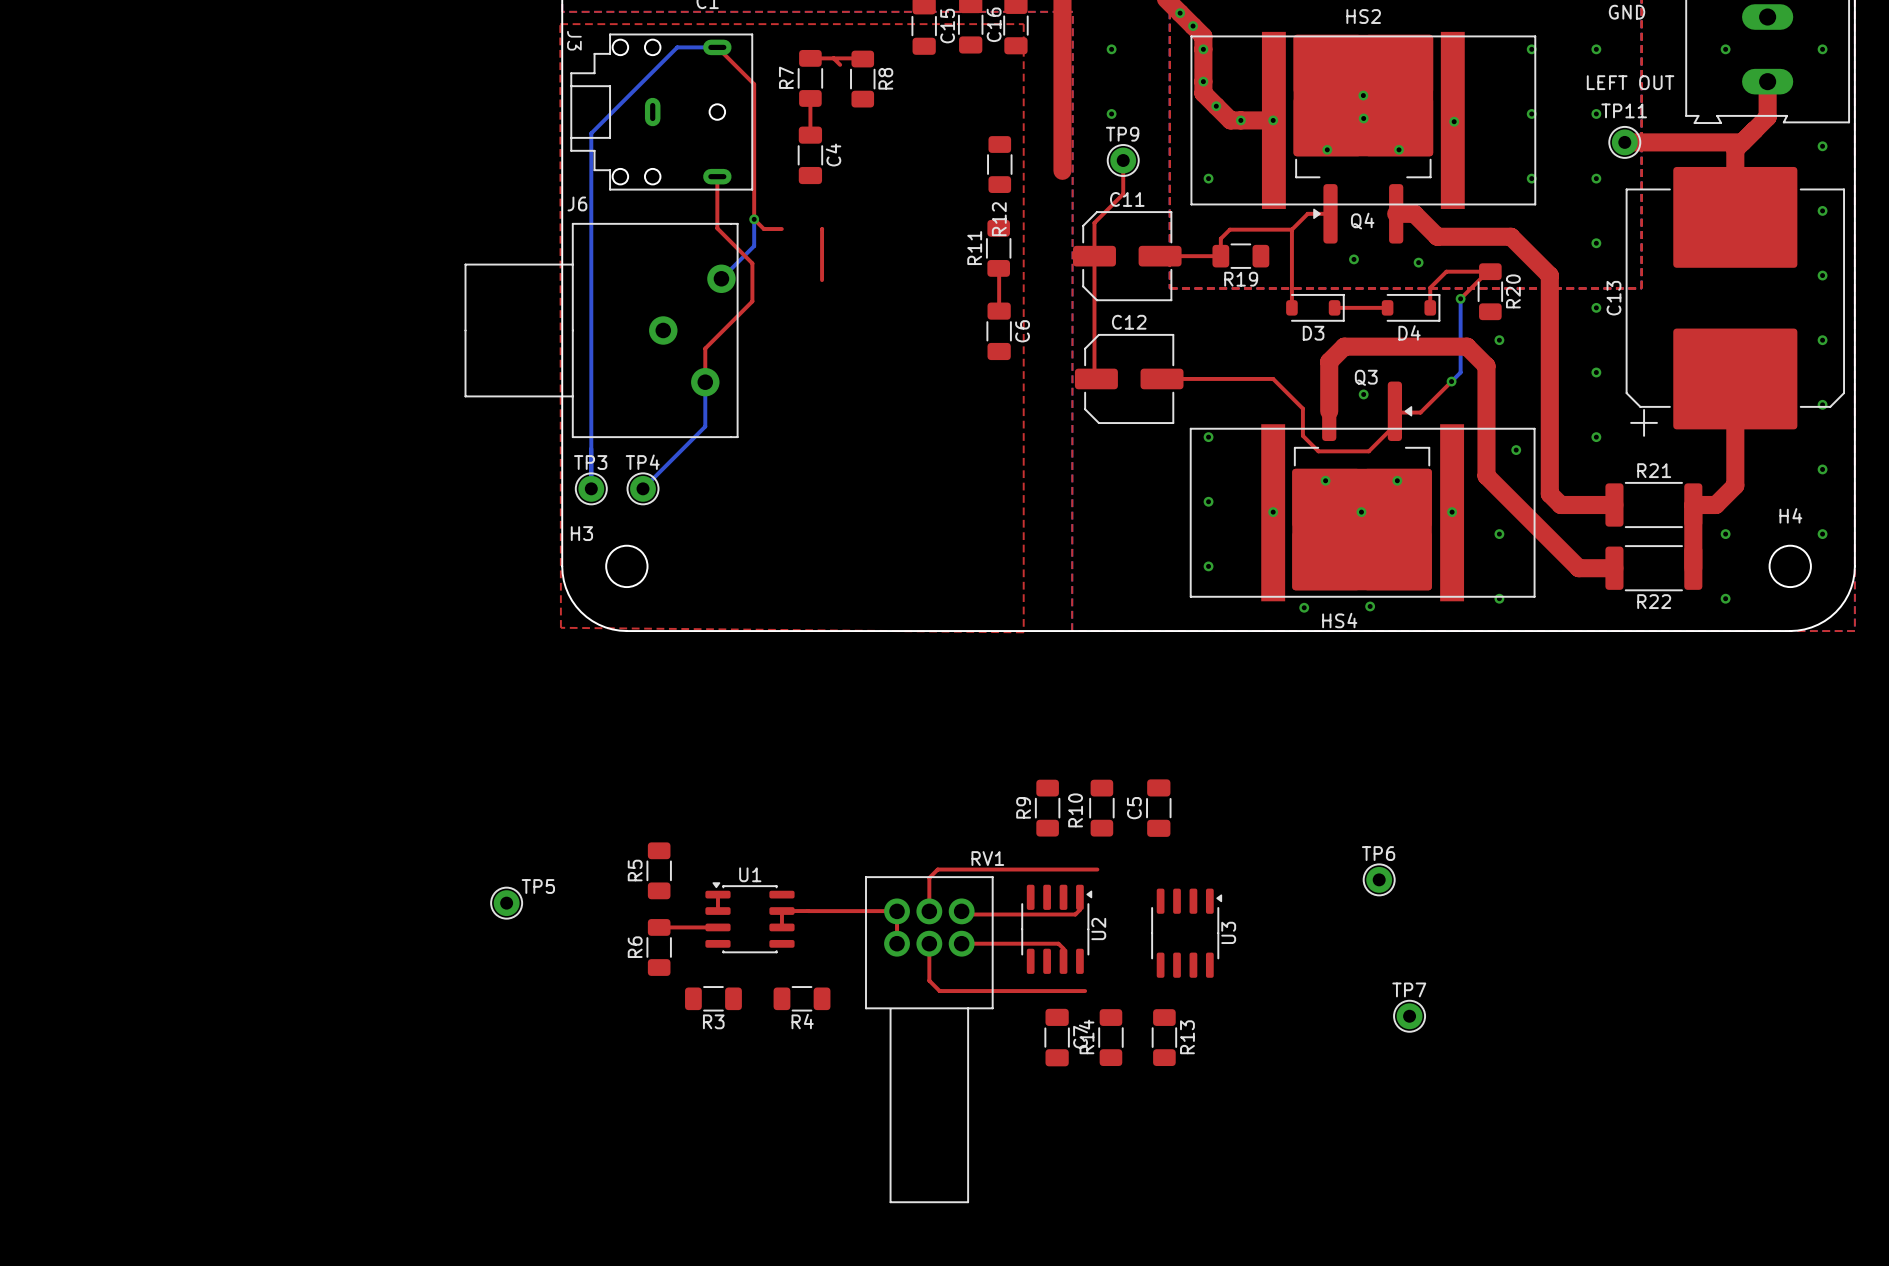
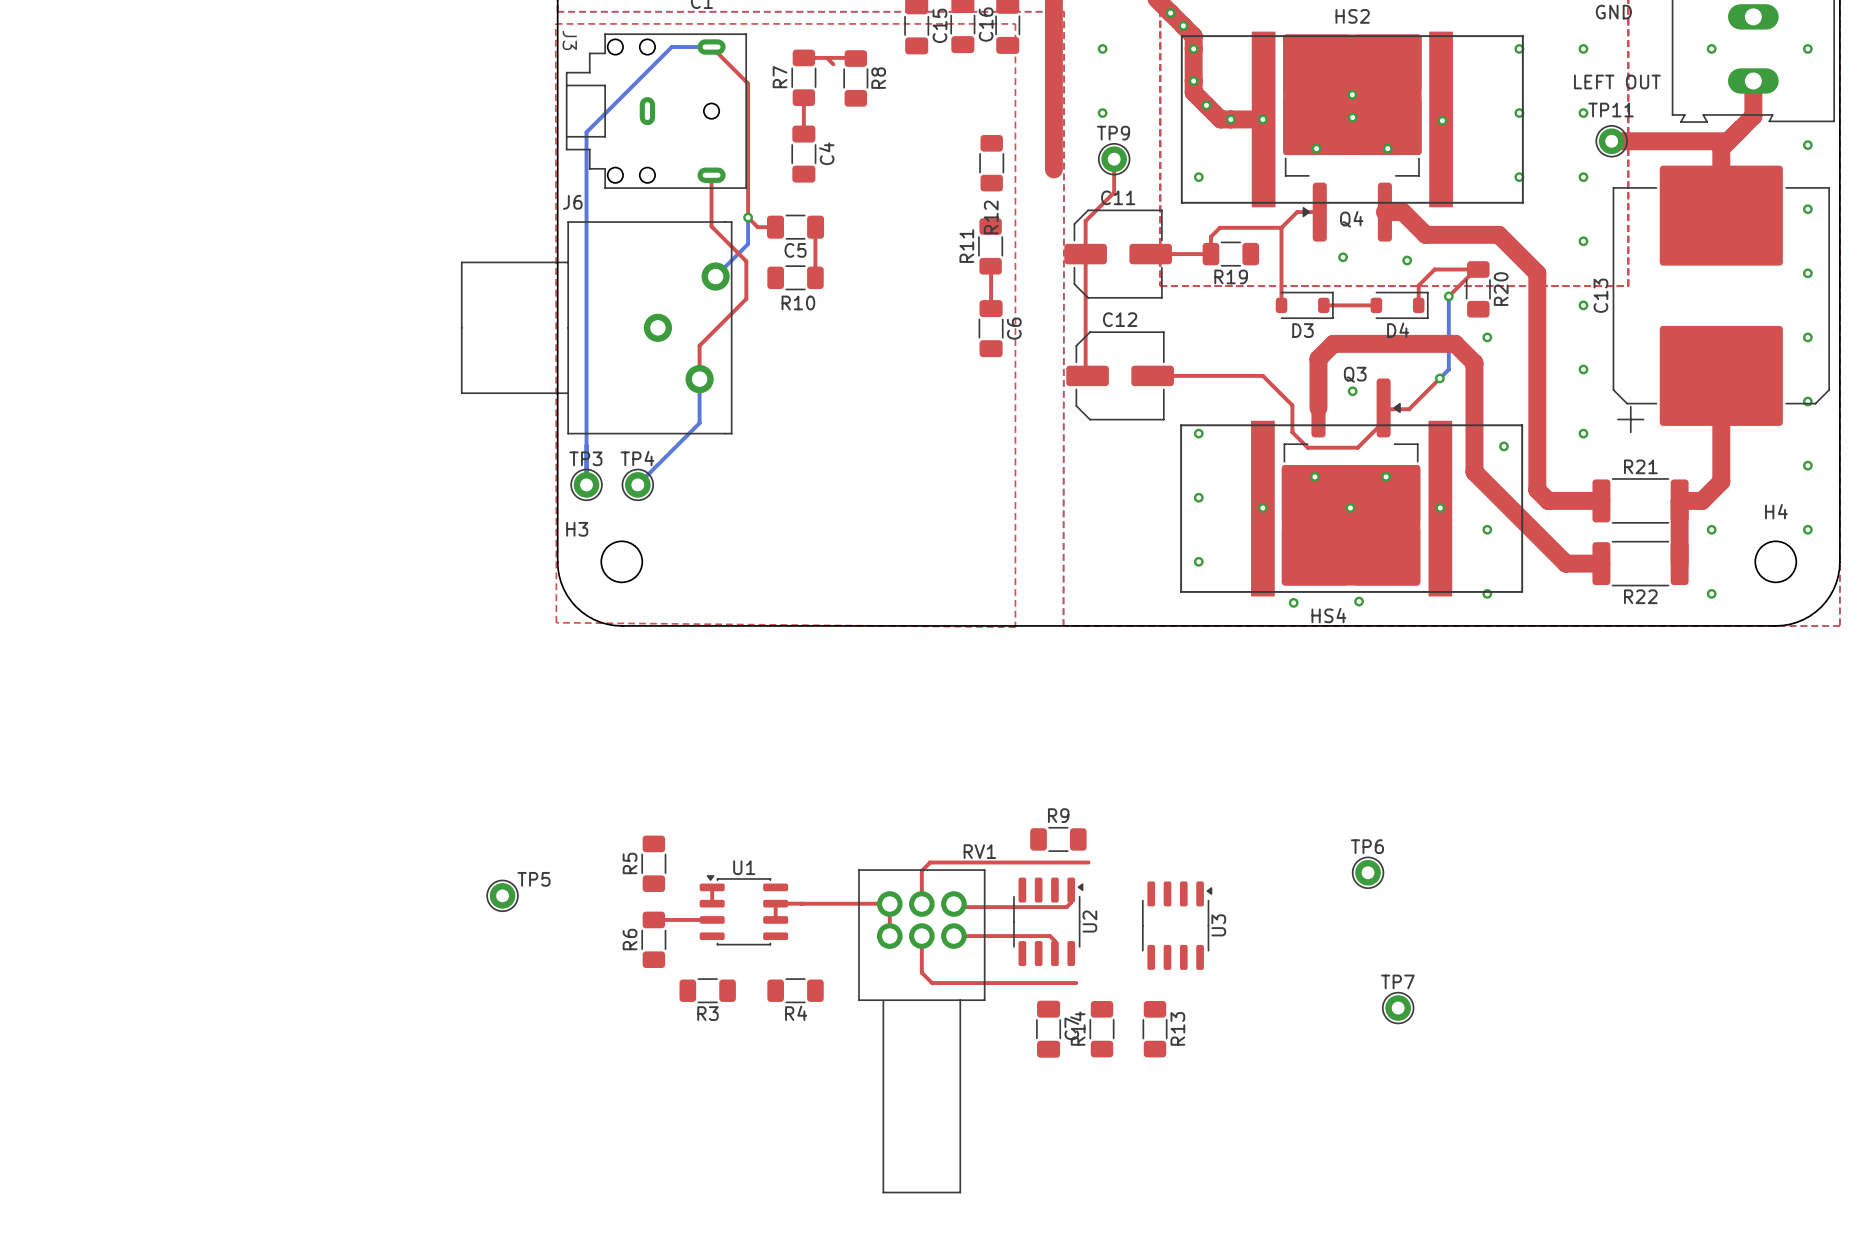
R9 rotation: 0° (1047, 808) -> 90° clockwise (1058, 839)
R9 position: (1047, 808) -> (1058, 839)
R10 rotation: 0° (1101, 808) -> 90° clockwise (795, 277)
R10 position: (1101, 808) -> (795, 277)
C5 name position: C5 (1134, 808) -> C5 (795, 250)
C5 rotation: 0° (1158, 808) -> 90° clockwise (795, 227)
C5 position: (1158, 808) -> (795, 227)
R10 name position: R10 (1075, 810) -> R10 (798, 302)

